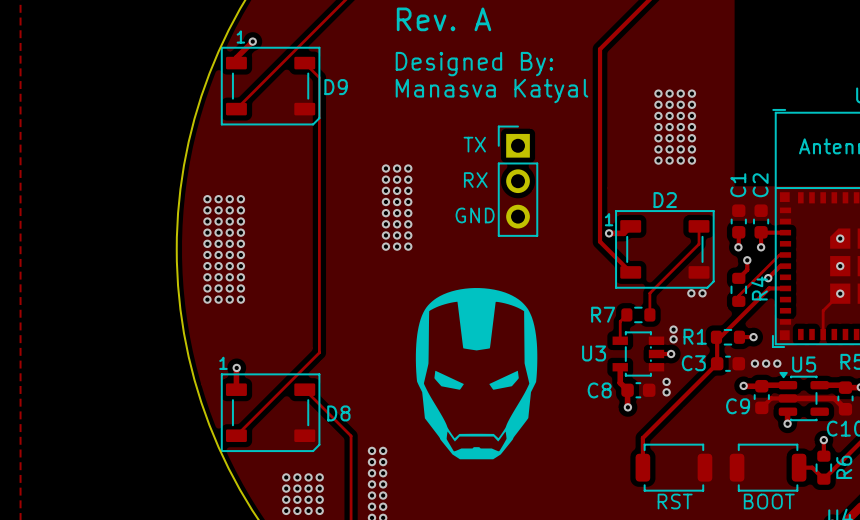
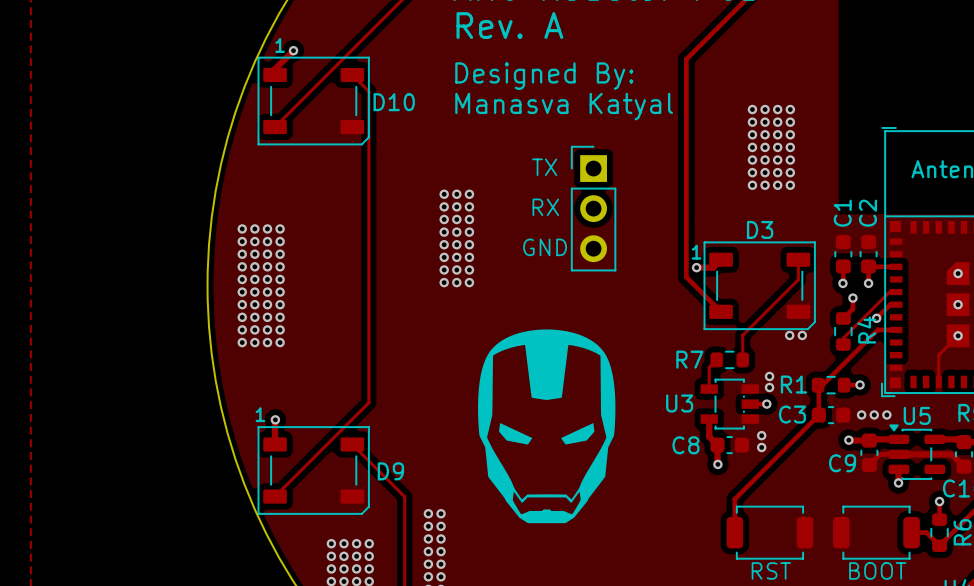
D9 name: D9 (336, 87) -> D10 (394, 102)
D2 name: D2 (665, 200) -> D3 (760, 229)
D8 name: D8 (338, 413) -> D9 (390, 471)

